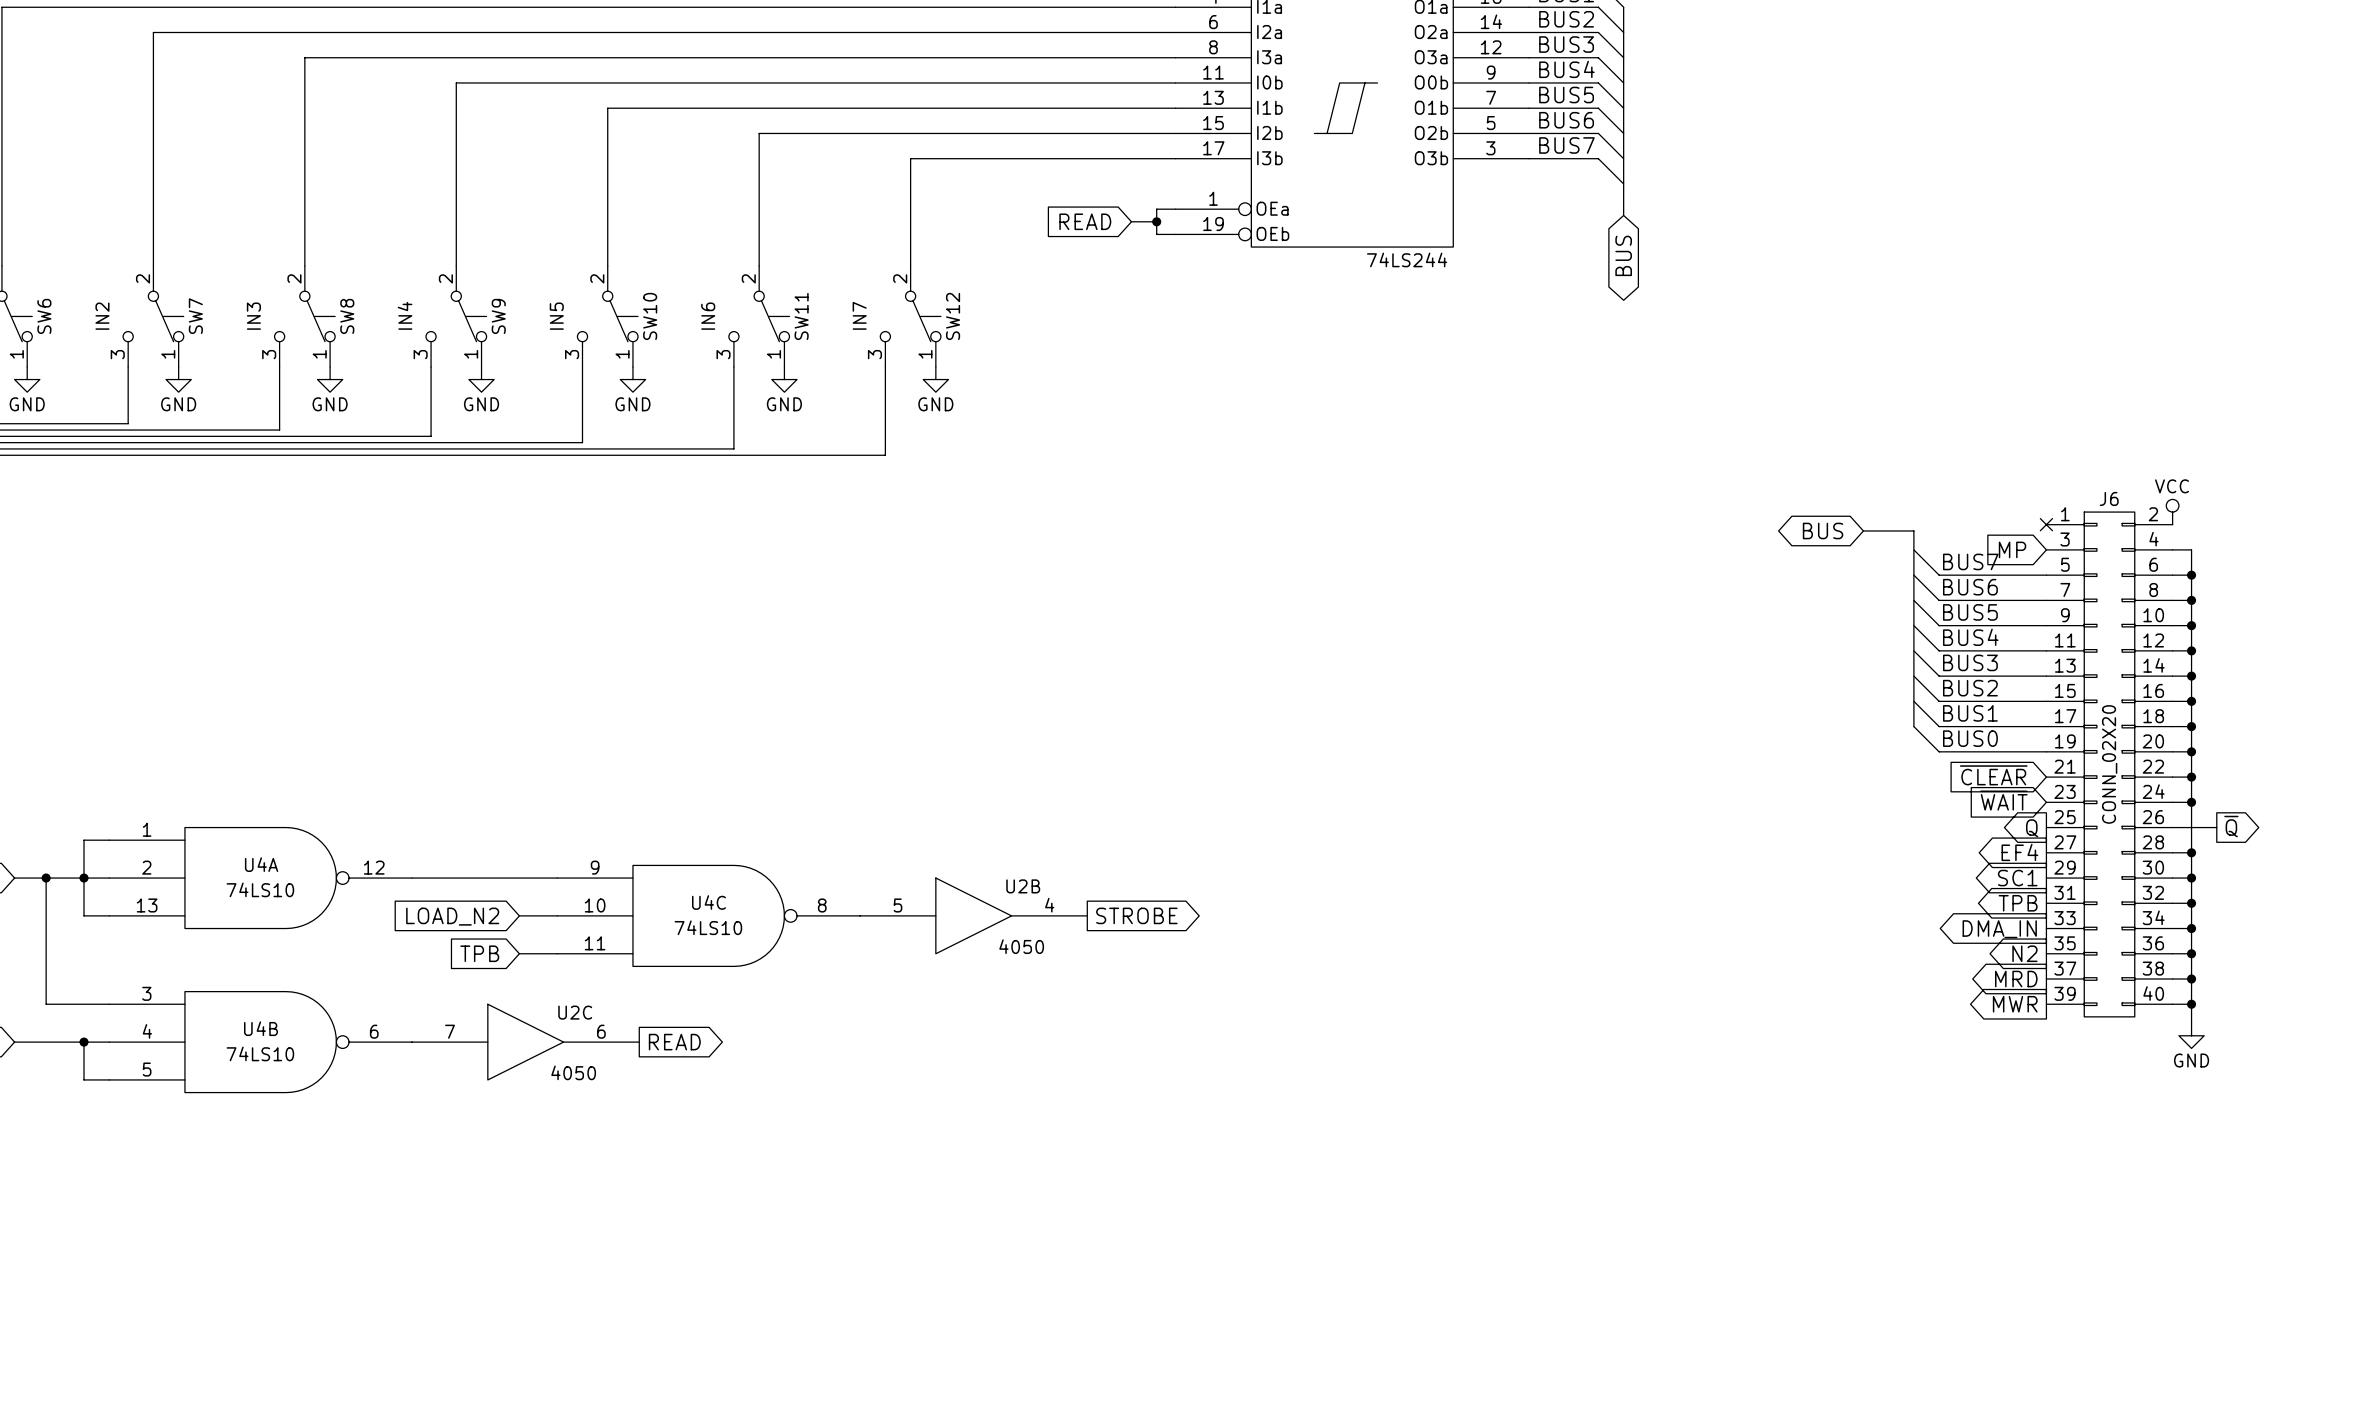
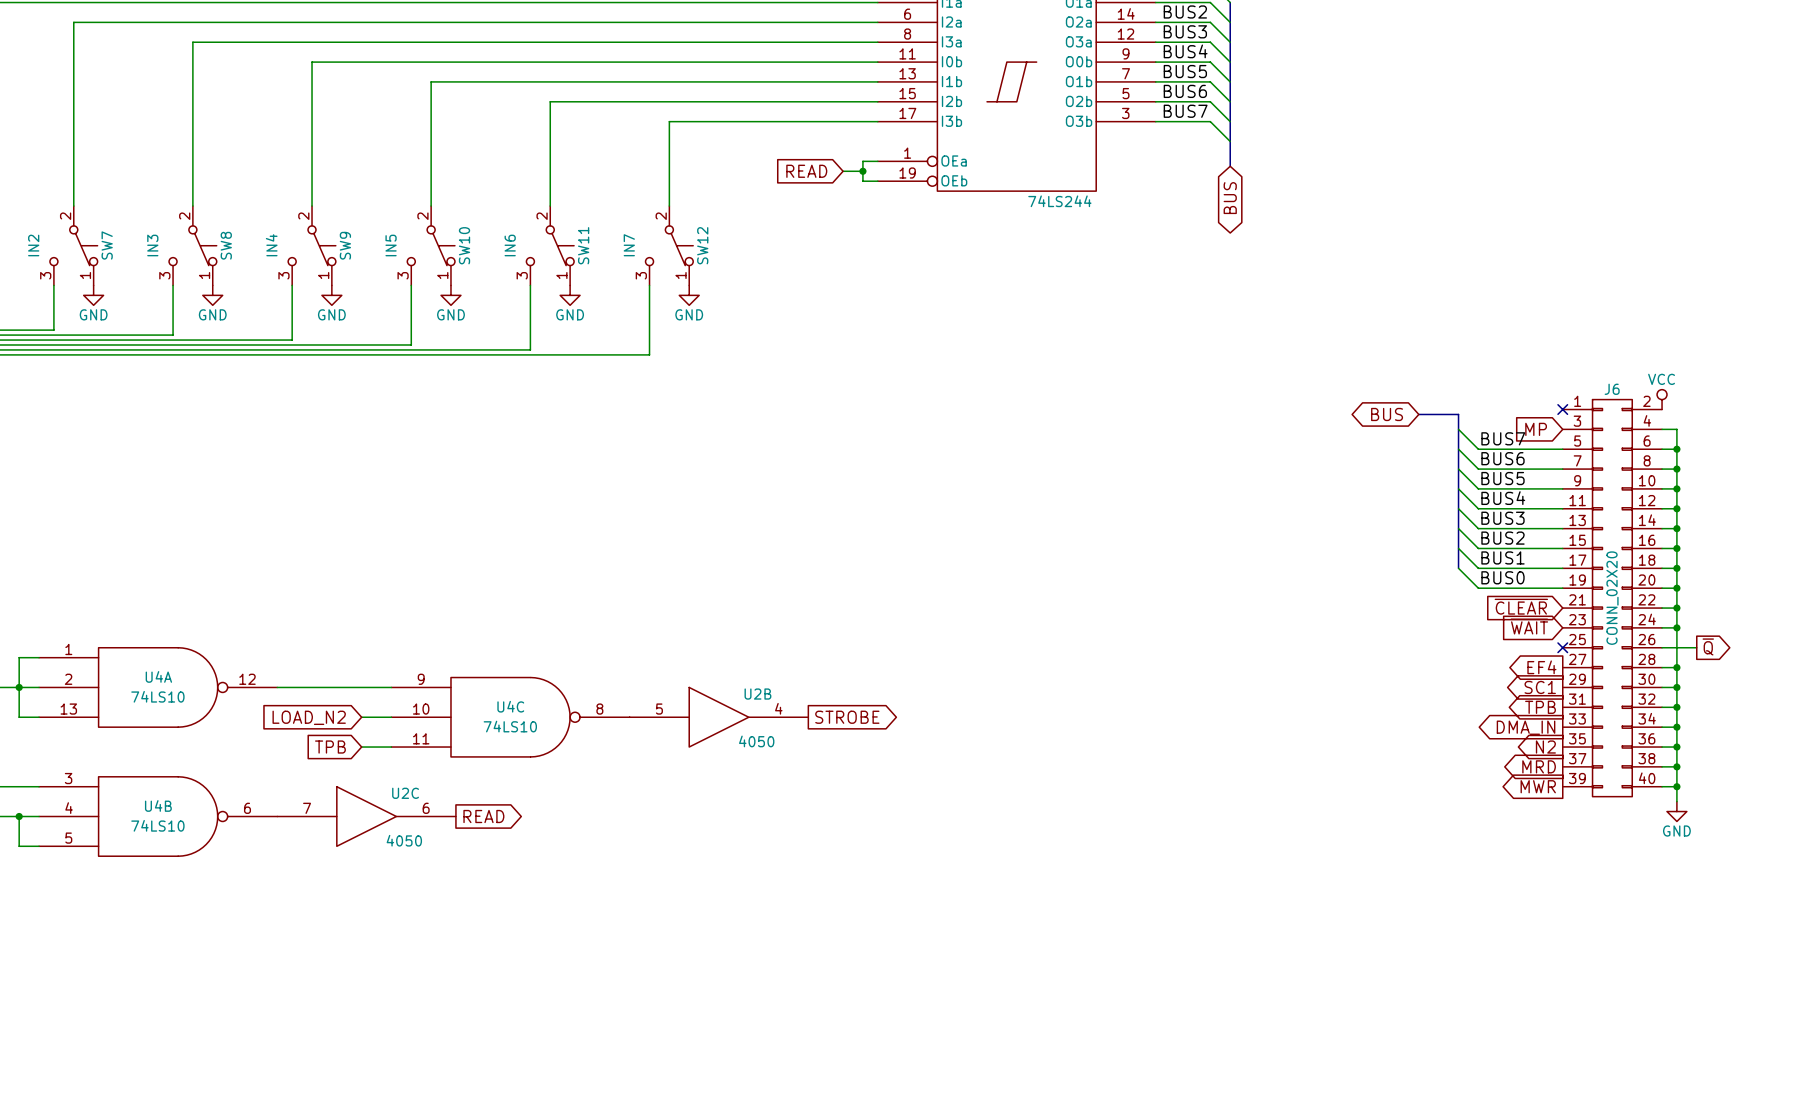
no-connect mark: none -> (1562, 647)
global label: Q (2032, 828) -> none

